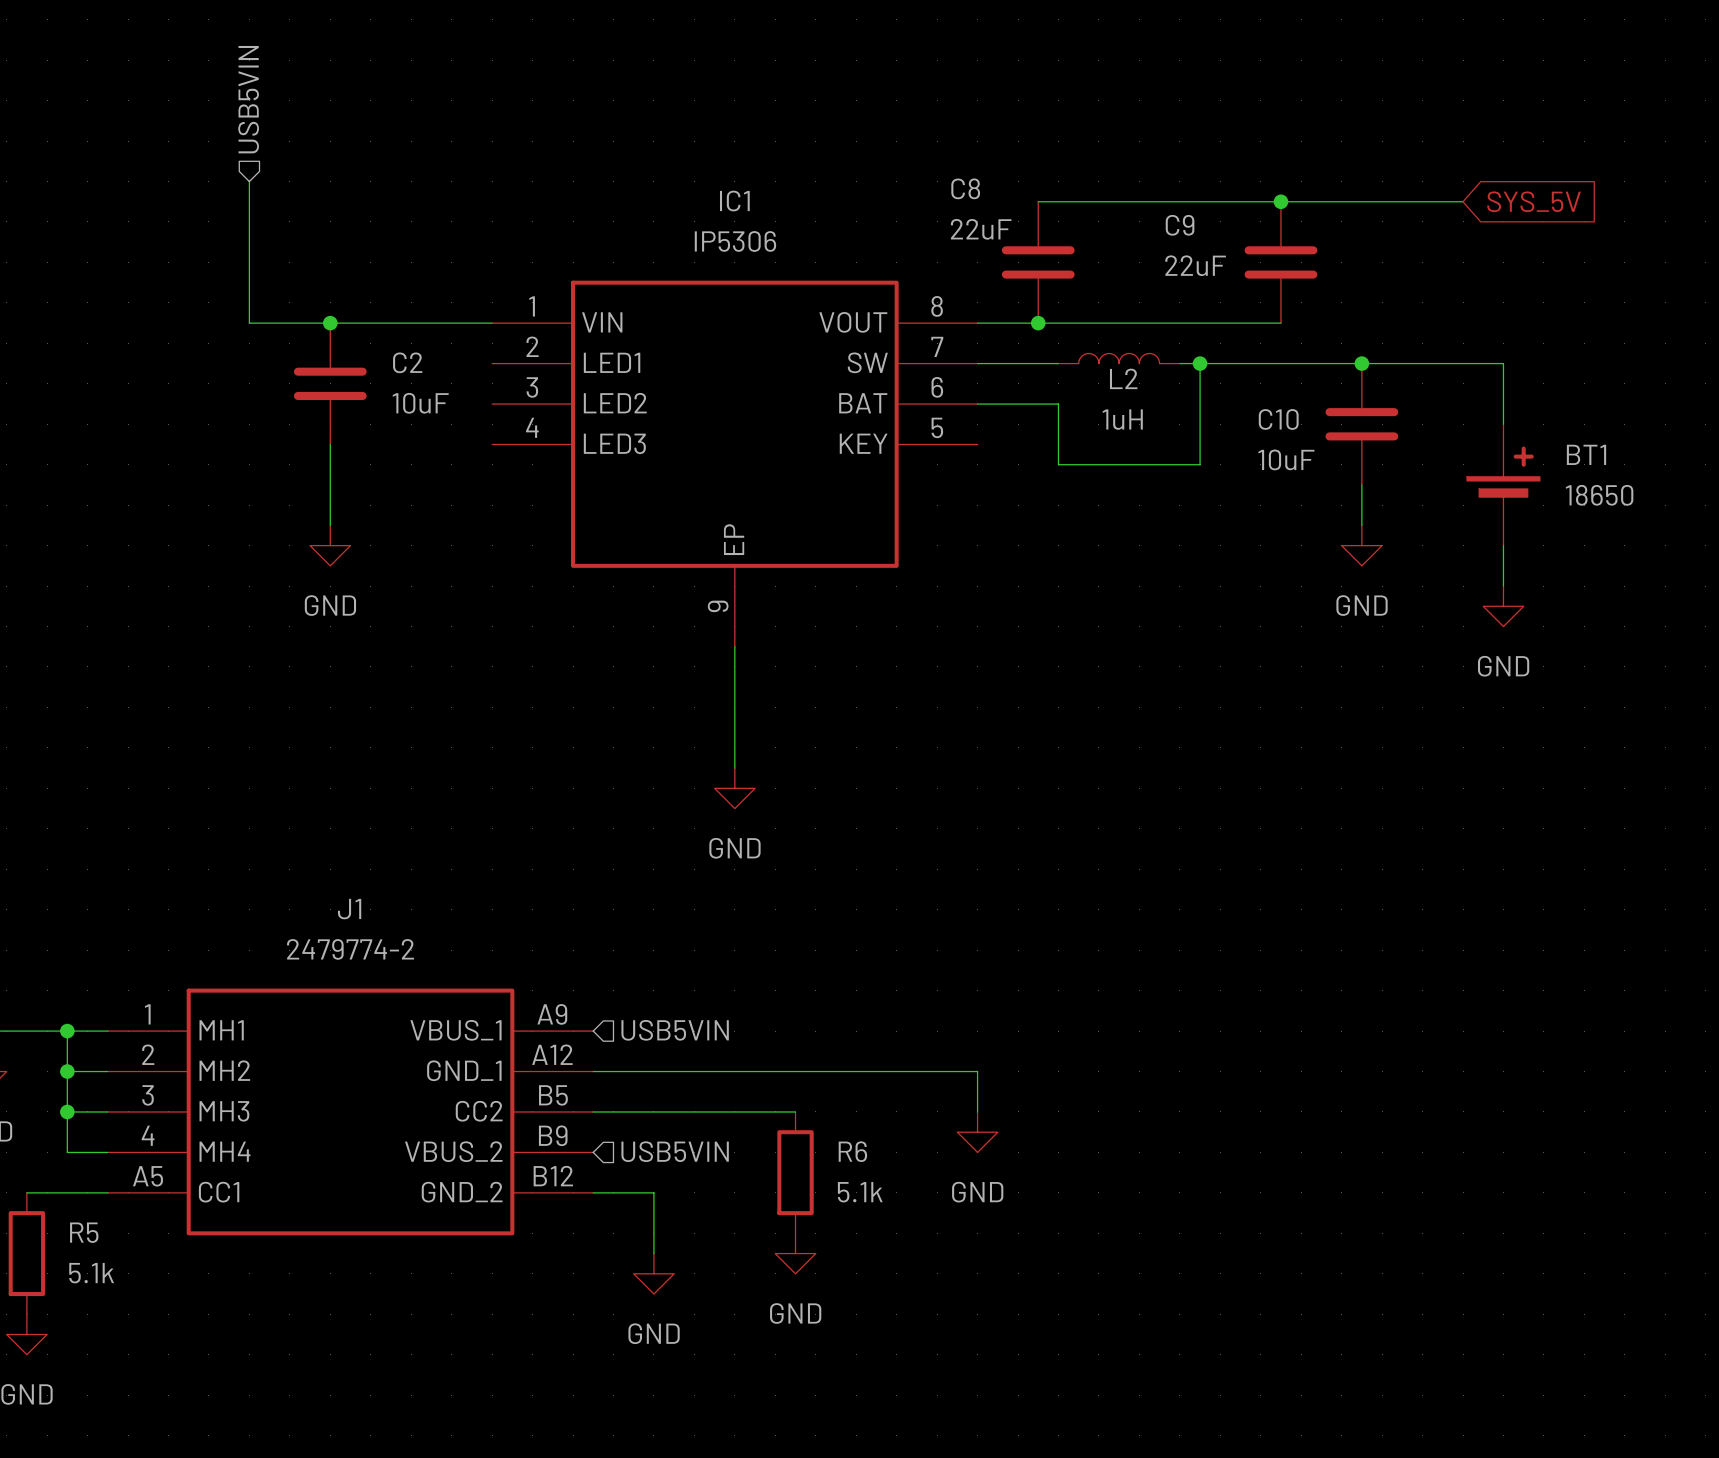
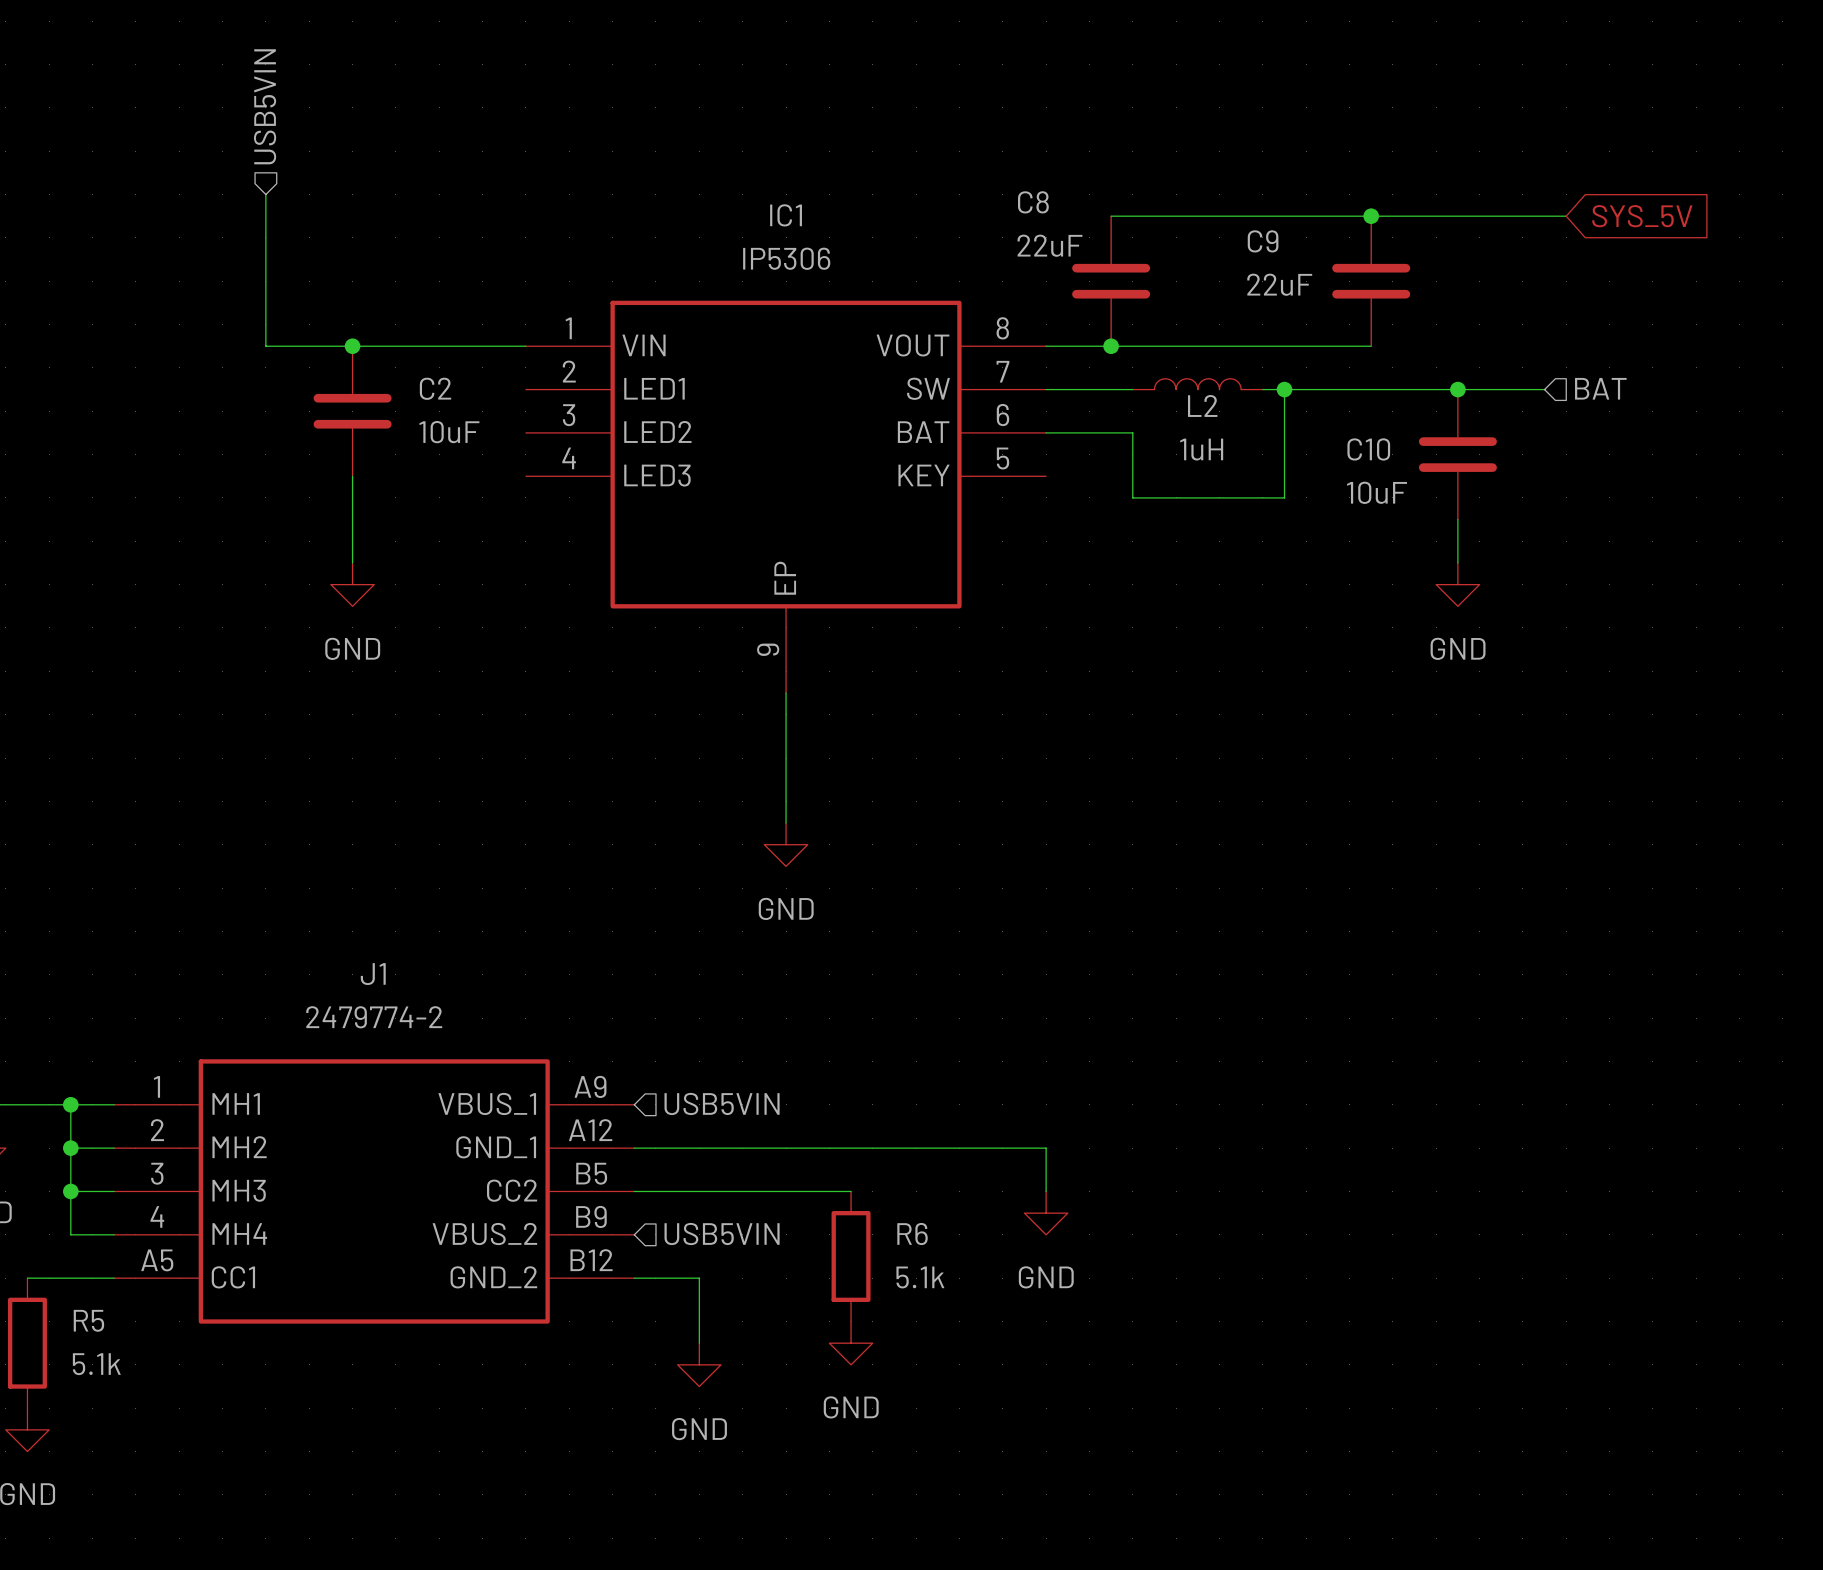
hierarchical label: none -> BAT (1600, 388)
wire: (1442, 363) (1503, 363) (1503, 424) -> none
BT1: 18650 (1503, 484) -> none
wire: (1503, 545) (1503, 586) -> none
power symbol: GND (1503, 606) -> none

